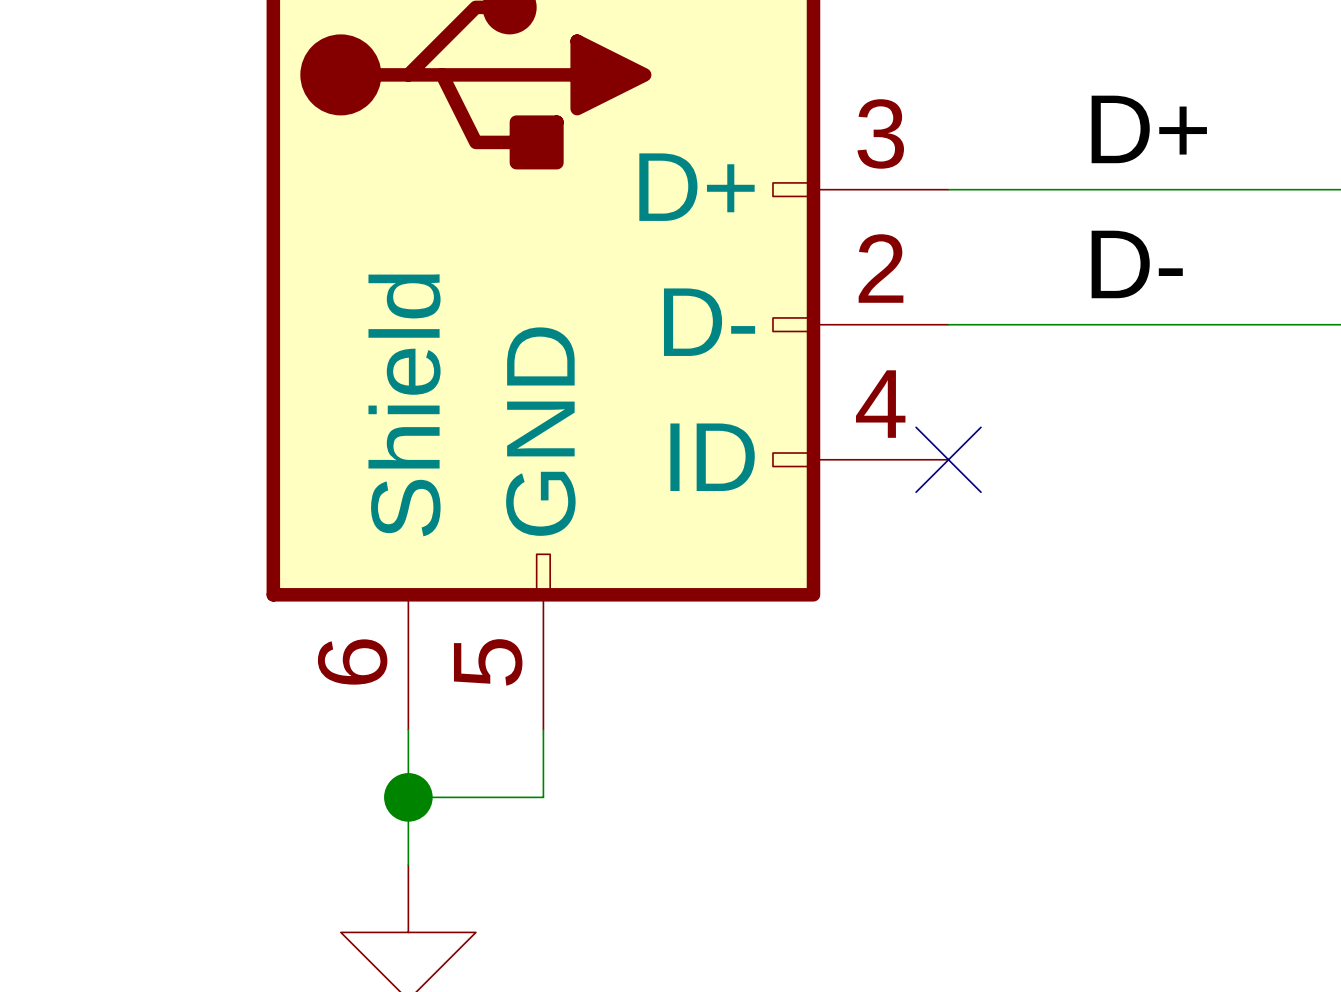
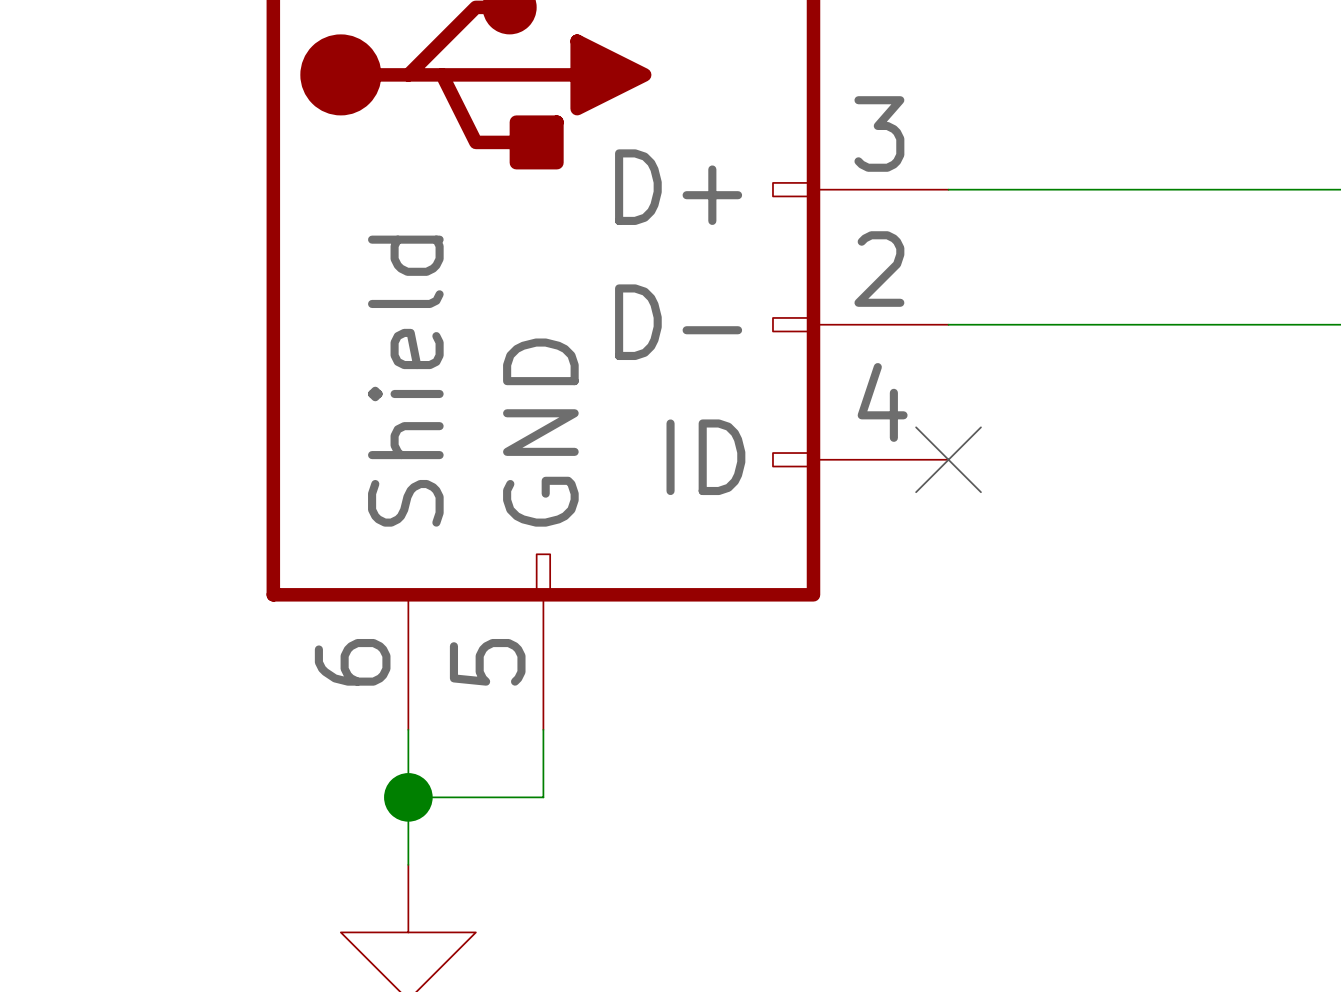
label: D+ (1149, 129) -> none
label: D- (1137, 264) -> none

